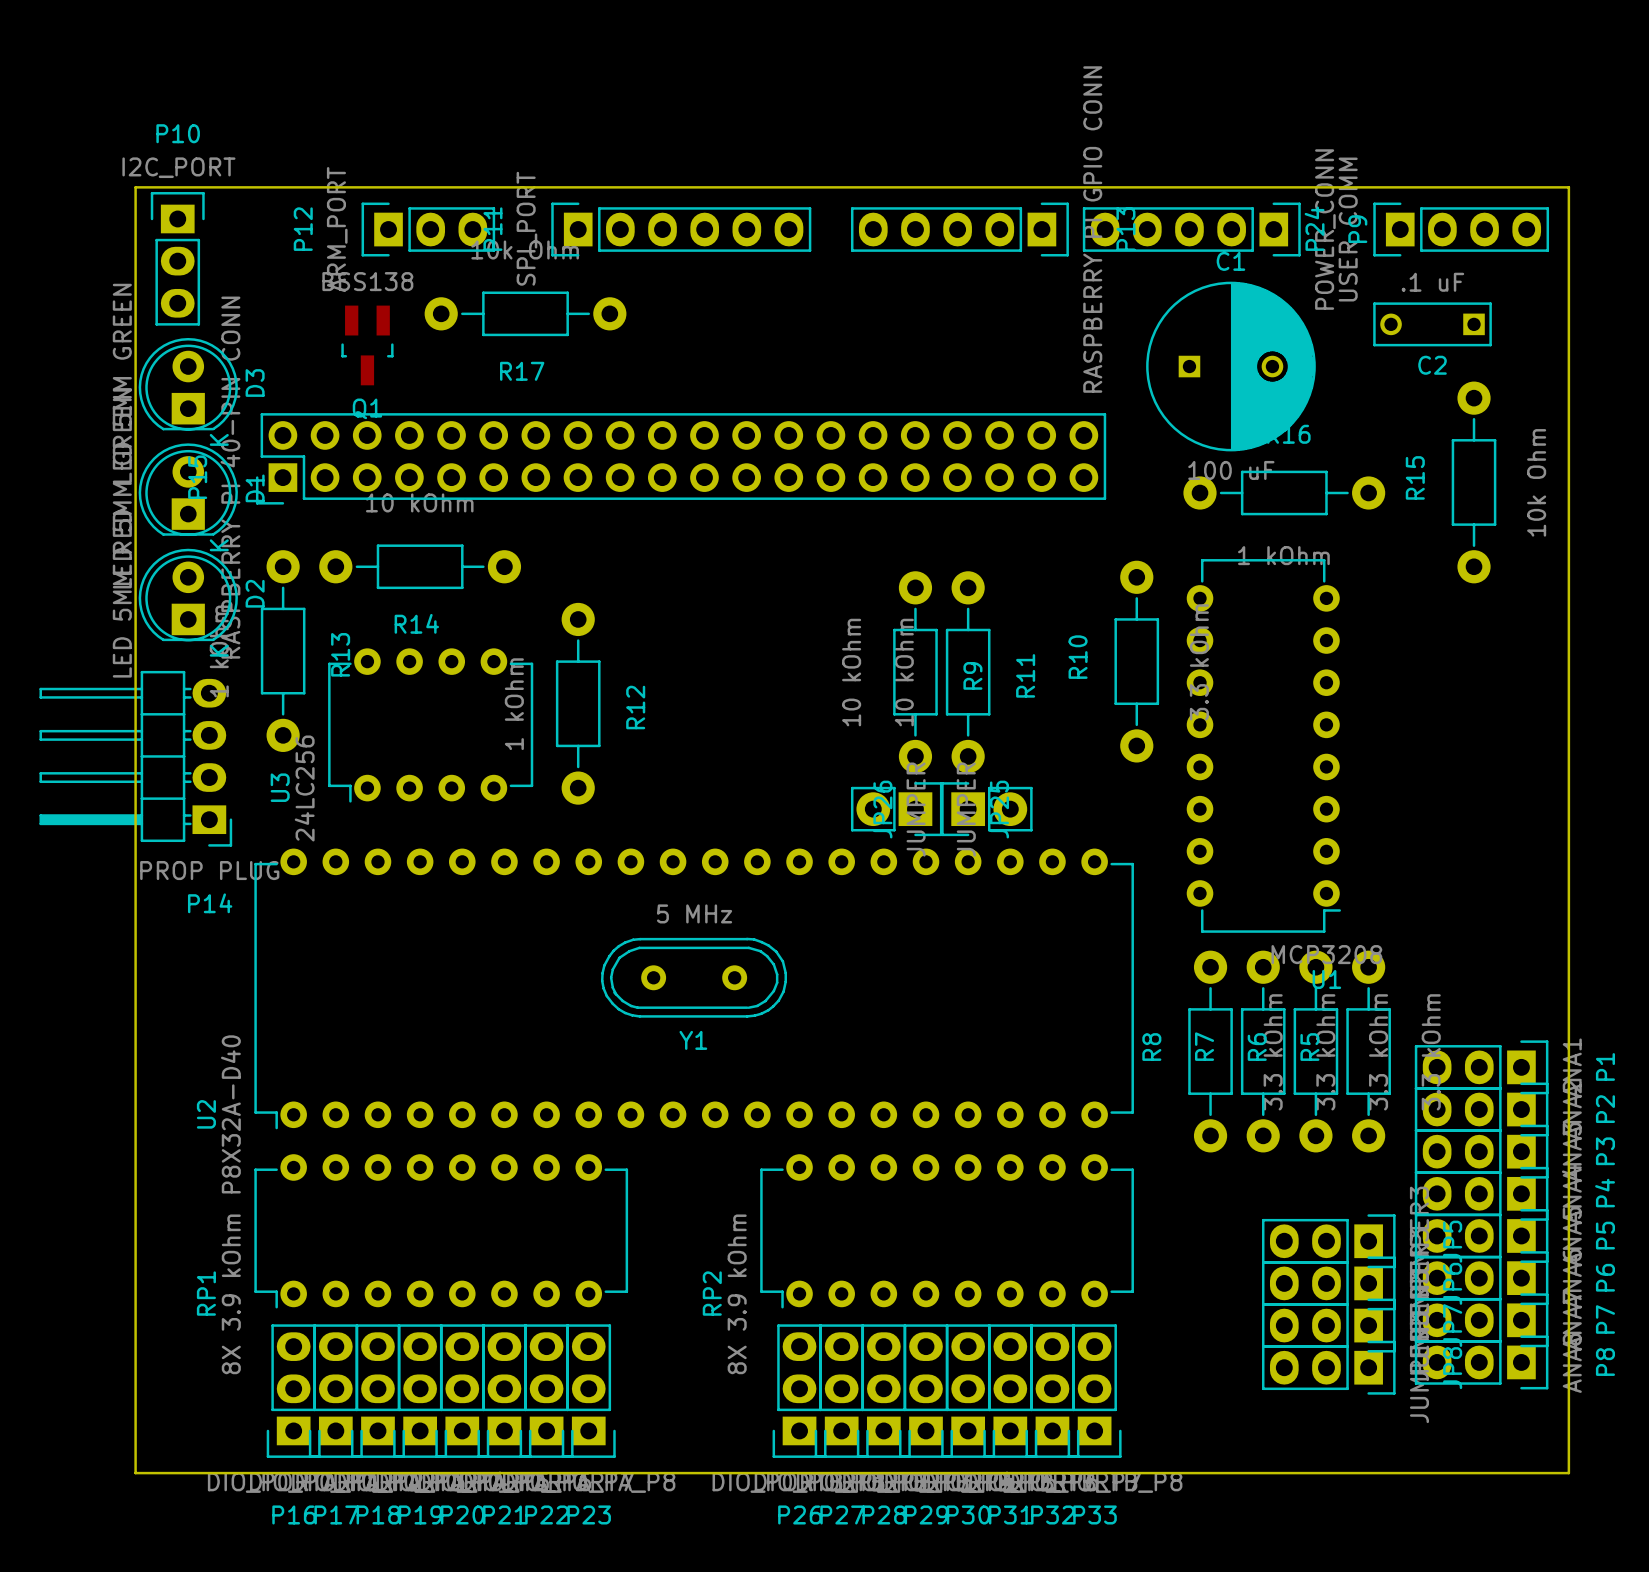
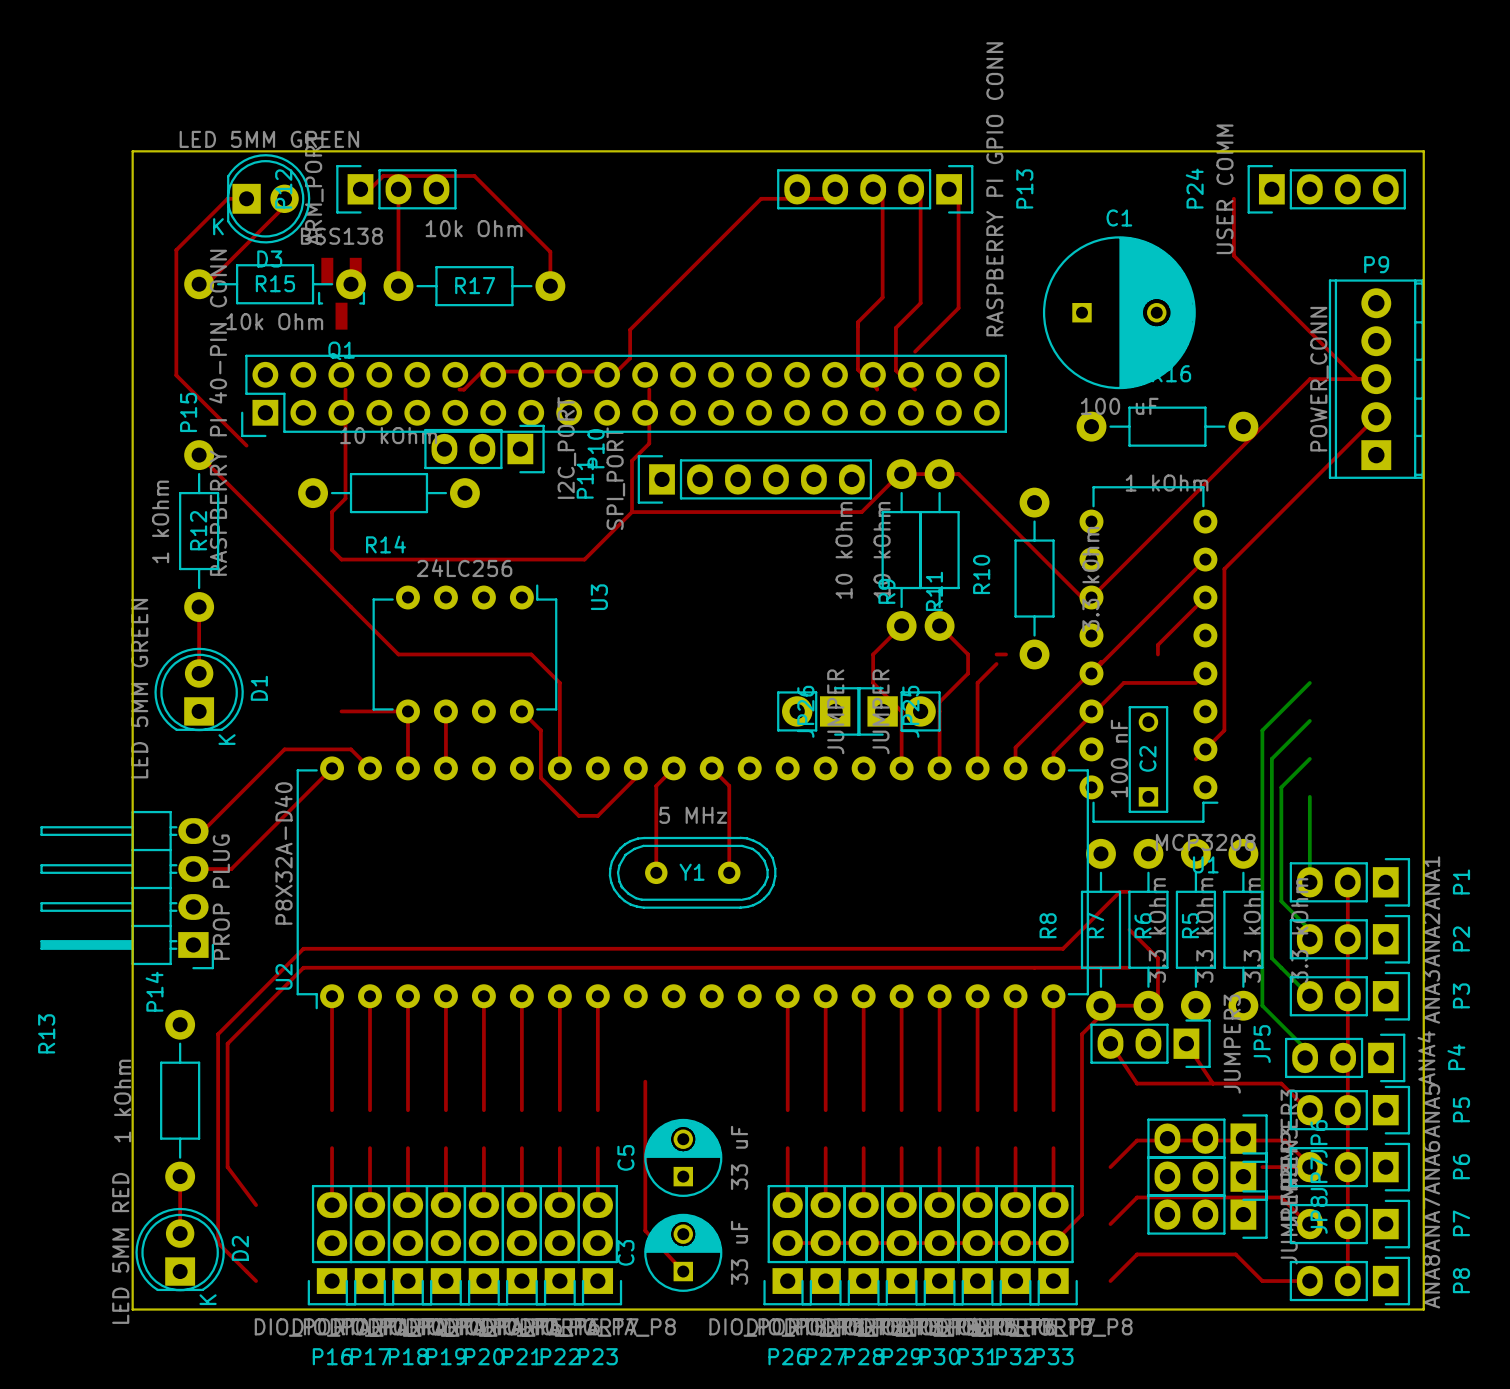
P9 footprint: [1082, 202, 1301, 257] -> [1328, 279, 1424, 479]
P11 position: (681, 229) -> (754, 479)
P9 value position: POWER_CONN (1325, 229) -> POWER_CONN (1319, 379)
P9 name position: P9 (1357, 229) -> P9 (1376, 264)
top track: none -> (246, 198) (227, 198) (176, 250) (176, 375) (246, 445)
top track: none -> (284, 198) (284, 206) (206, 284) (199, 284)
top track: none -> (360, 198) (383, 176) (474, 176) (550, 251) (550, 286)
top track: none -> (398, 198) (398, 286)
top track: none -> (844, 198) (761, 198) (630, 329) (630, 358) (616, 371) (482, 371) (463, 389) (459, 389)
top track: none -> (882, 198) (882, 297) (857, 322) (857, 369) (877, 389)
top track: none -> (920, 198) (920, 303) (895, 327) (895, 370) (915, 389)
top track: none -> (958, 198) (958, 308) (915, 351)
top track: none -> (1233, 198) (1233, 255) (1357, 379)
P10 rotation: 0° (177, 258) -> 90° clockwise (484, 449)
P10 position: (177, 258) -> (484, 449)
C2 value: .1 uF (1432, 282) -> 100 nF (1119, 758)
R17 position: (525, 313) -> (474, 286)
C2 rotation: 0° (1432, 324) -> 90° clockwise (1148, 759)
C2 position: (1432, 324) -> (1148, 759)
C2 name position: C2 (1432, 365) -> C2 (1147, 758)
R17 name position: R17 (522, 371) -> R17 (475, 285)
D3 rotation: 0° (188, 384) -> 90° clockwise (268, 198)
D3 position: (188, 384) -> (268, 198)
top track: none -> (1376, 379) (1309, 379) (1091, 597) (1082, 597) (958, 474) (899, 474) (861, 512) (632, 512)
top track: none -> (345, 389) (345, 498) (332, 512) (332, 550) (341, 559) (584, 559) (632, 512)
top track: none -> (649, 389) (649, 443) (632, 460) (632, 512)
R15 name position: R15 (1415, 477) -> R15 (275, 283)
R15 rotation: 0° (1474, 482) -> 90° clockwise (275, 284)
R15 position: (1474, 482) -> (275, 284)
top track: none -> (1376, 417) (1224, 569) (1224, 730) (1195, 758)
D1 position: (188, 489) -> (199, 689)
top track: none -> (199, 455) (398, 654) (531, 654) (559, 682) (559, 768)
D2 position: (188, 595) -> (180, 1249)
R13 position: (283, 651) -> (180, 1100)
top track: none -> (1195, 569) (1015, 747) (1015, 768)
R13 name position: R13 (340, 654) -> R13 (46, 1033)
R9 position: (915, 672) -> (901, 550)
R11 position: (968, 672) -> (939, 550)
top track: none -> (199, 607) (199, 673)
top track: none -> (1195, 607) (1157, 644) (1157, 654)
R12 position: (578, 703) -> (199, 531)
R12 value position: 1 kOhm (514, 704) -> 1 kOhm (160, 521)
R12 name position: R12 (635, 707) -> R12 (198, 530)
top track: none -> (901, 626) (873, 654) (873, 682) (901, 711) (901, 768)
top track: none -> (939, 626) (968, 654) (968, 673) (939, 701) (939, 768)
U3 rotation: 0° (430, 725) -> 180° (464, 653)
top track: none -> (996, 654) (1006, 654)
top track: none -> (996, 663) (977, 682) (977, 768)
P14 position: (135, 758) -> (127, 890)
top track: none -> (1195, 682) (1123, 682) (1053, 753) (1053, 768)
bottom track: none -> (1309, 682) (1262, 730) (1262, 1005) (1309, 1053)
U3 value position: 24LC256 (304, 788) -> 24LC256 (464, 568)
top track: none -> (341, 711) (407, 711) (407, 768)
top track: none -> (445, 711) (445, 768)
top track: none -> (521, 711) (540, 730) (540, 777) (578, 815) (597, 815) (635, 777) (635, 768)
bottom track: none -> (1309, 720) (1271, 758) (1271, 958) (1309, 996)
bottom track: none -> (1309, 758) (1281, 787) (1281, 901) (1309, 929) (1309, 939)
P14 value rotation: 0° (209, 870) -> 90° counterclockwise (221, 897)
top track: none -> (332, 768) (231, 869) (193, 869)
top track: none -> (370, 768) (351, 749) (284, 749) (202, 831) (193, 831)
top track: none -> (673, 768) (656, 785) (656, 872)
top track: none -> (711, 768) (729, 785) (729, 872)
P14 name rotation: 0° (210, 903) -> 90° counterclockwise (154, 991)
bottom track: none -> (1309, 796) (1309, 882)
Y1 position: (693, 977) -> (692, 872)
U2 position: (694, 988) -> (692, 882)
top track: none -> (1347, 882) (1347, 1281)
top track: none -> (1129, 891) (1119, 891) (1063, 948) (303, 948) (218, 1034) (218, 1243) (256, 1281)
Y1 name position: Y1 (693, 1040) -> Y1 (692, 872)
top track: none -> (1129, 929) (1157, 958) (1157, 996) (1148, 1005) (1110, 1005) (1082, 1034) (1082, 1214) (1053, 1243) (787, 1243)
P1 position: (1481, 1067) -> (1349, 882)
top track: none -> (1129, 967) (303, 967) (227, 1043) (227, 1167) (256, 1205)
P2 position: (1481, 1109) -> (1349, 939)
U2 name position: U2 (206, 1114) -> U2 (284, 976)
U2 value position: P8X32A-D40 (230, 1114) -> P8X32A-D40 (283, 853)
top track: none -> (332, 996) (332, 1110)
top track: none -> (370, 996) (370, 1110)
top track: none -> (407, 996) (407, 1110)
top track: none -> (445, 996) (445, 1110)
top track: none -> (483, 996) (483, 1110)
top track: none -> (521, 996) (521, 1110)
top track: none -> (559, 996) (559, 1110)
top track: none -> (597, 996) (597, 1110)
top track: none -> (787, 996) (787, 1110)
top track: none -> (825, 996) (825, 1110)
top track: none -> (863, 996) (863, 1110)
top track: none -> (901, 996) (901, 1110)
top track: none -> (939, 996) (939, 1110)
top track: none -> (977, 996) (977, 1110)
top track: none -> (1015, 996) (1015, 1110)
top track: none -> (1053, 996) (1053, 1110)
P3 position: (1481, 1151) -> (1349, 996)
top track: none -> (1110, 1043) (1137, 1083) (1281, 1083) (1307, 1110)
top track: none -> (1186, 1043) (1213, 1083)
top track: none -> (645, 1081) (645, 1230) (683, 1271)
RP1: 8X 3.9 kOhm (441, 1231) -> none
RP2: 8X 3.9 kOhm (947, 1231) -> none
P5 position: (1481, 1235) -> (1349, 1110)
JP5 position: (1328, 1241) -> (1150, 1043)
P6 position: (1481, 1278) -> (1349, 1167)
top track: none -> (332, 1148) (332, 1205)
top track: none -> (370, 1148) (370, 1205)
top track: none -> (407, 1148) (407, 1205)
top track: none -> (445, 1148) (445, 1205)
top track: none -> (483, 1148) (483, 1205)
top track: none -> (521, 1148) (521, 1205)
top track: none -> (559, 1148) (559, 1205)
top track: none -> (597, 1148) (597, 1205)
top track: none -> (787, 1148) (787, 1205)
top track: none -> (825, 1148) (825, 1205)
top track: none -> (863, 1148) (863, 1205)
top track: none -> (901, 1148) (901, 1205)
top track: none -> (939, 1148) (939, 1205)
top track: none -> (977, 1148) (977, 1205)
top track: none -> (1015, 1148) (1015, 1205)
top track: none -> (1053, 1148) (1053, 1205)
C5: none -> 33 uF (683, 1157)
top track: none -> (1110, 1167) (1137, 1140) (1285, 1140) (1309, 1165) (1309, 1167) (1262, 1167)
P7 position: (1481, 1320) -> (1349, 1224)
top track: none -> (180, 1176) (180, 1233)
P8 position: (1481, 1362) -> (1349, 1281)
top track: none -> (1306, 1222) (1281, 1197) (1137, 1197) (1110, 1224)
P16 position: (293, 1391) -> (332, 1245)
P17 position: (335, 1391) -> (370, 1245)
P18 position: (377, 1391) -> (407, 1245)
P19 position: (420, 1391) -> (445, 1245)
P20 position: (462, 1391) -> (483, 1245)
P21 position: (504, 1391) -> (521, 1245)
P22 position: (546, 1391) -> (559, 1245)
P23 position: (588, 1391) -> (597, 1245)
P26 position: (799, 1391) -> (787, 1245)
P27 position: (841, 1391) -> (825, 1245)
P28 position: (883, 1391) -> (863, 1245)
P29 position: (926, 1391) -> (901, 1245)
P30 position: (968, 1391) -> (939, 1245)
P31 position: (1010, 1391) -> (977, 1245)
P32 position: (1052, 1391) -> (1015, 1245)
P33 position: (1094, 1391) -> (1053, 1245)
C3: none -> 33 uF (683, 1252)
top track: none -> (1110, 1281) (1137, 1254) (1235, 1254) (1262, 1281) (1309, 1281)

